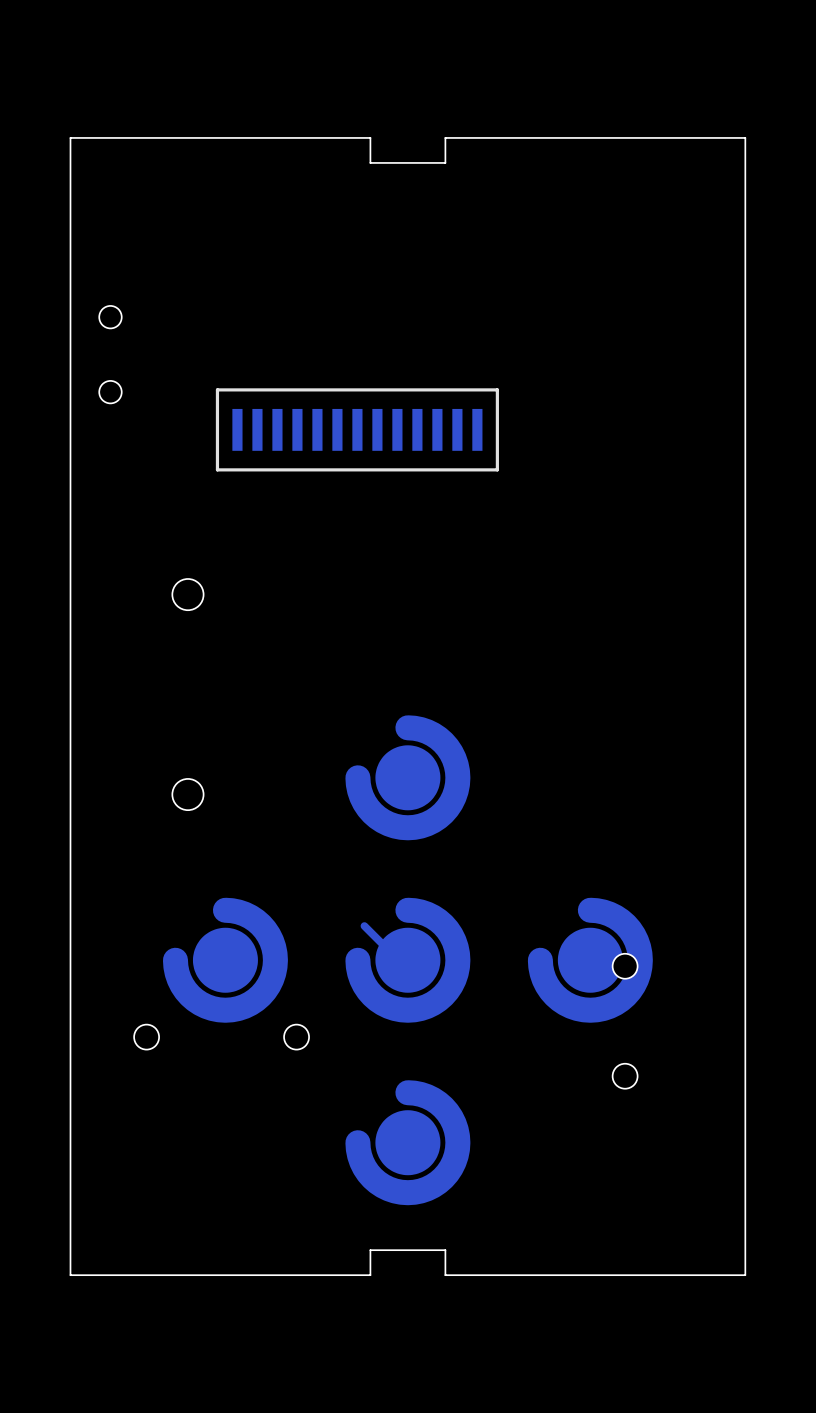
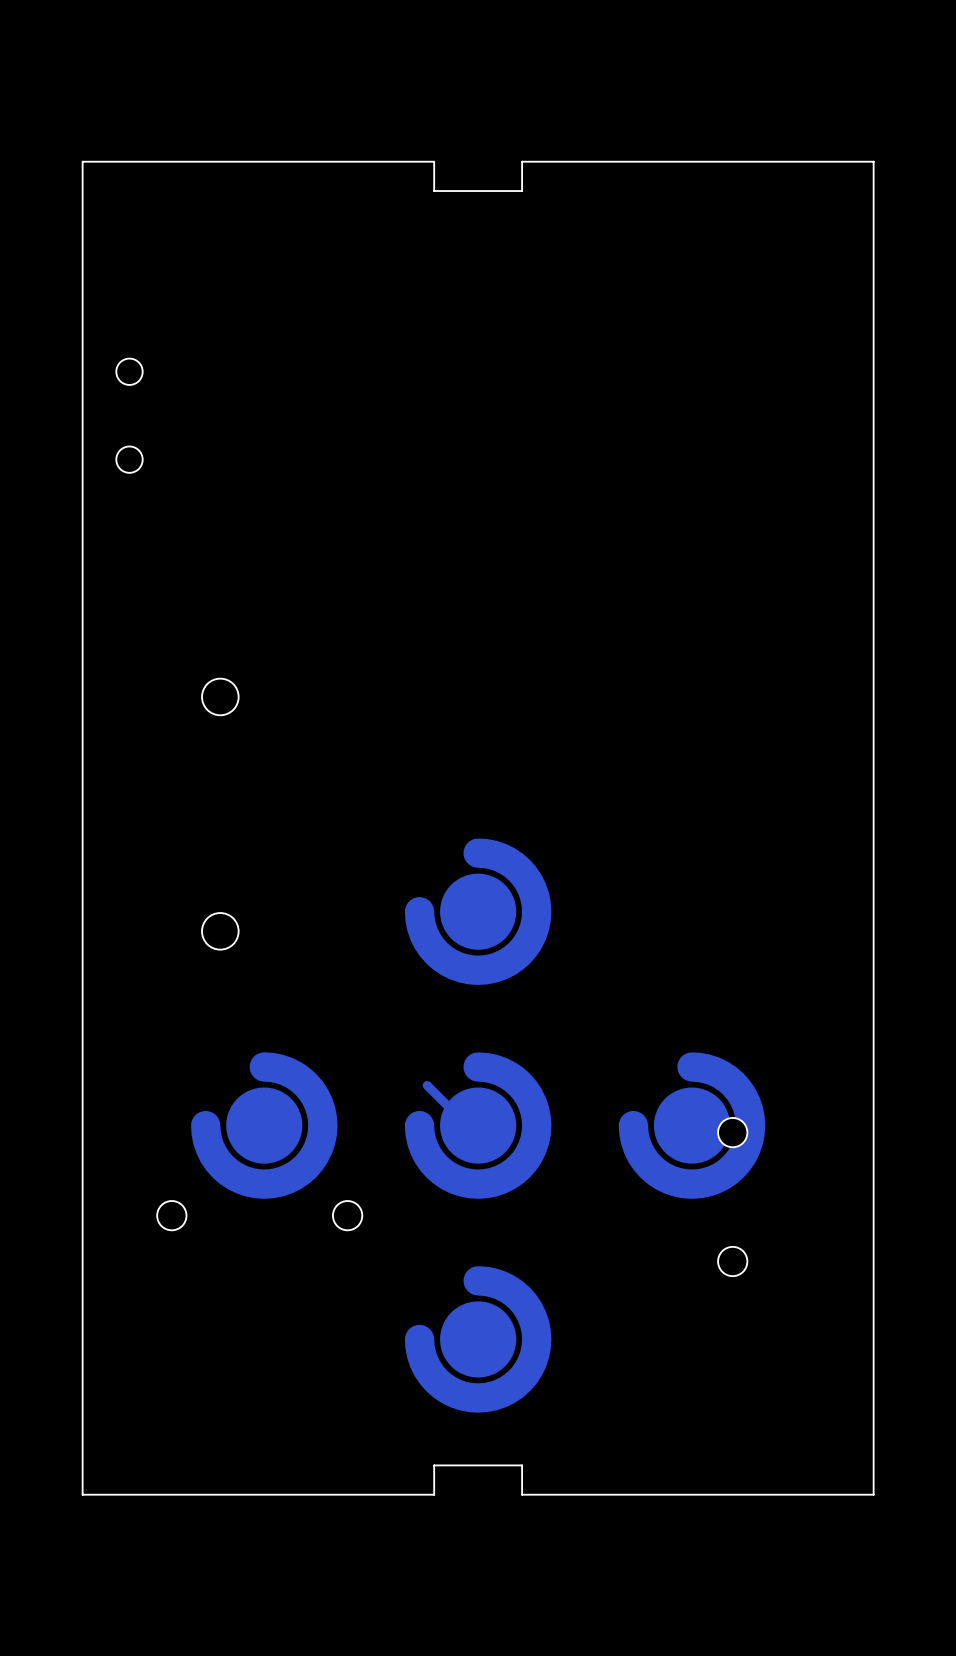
part: (357, 429) -> none

